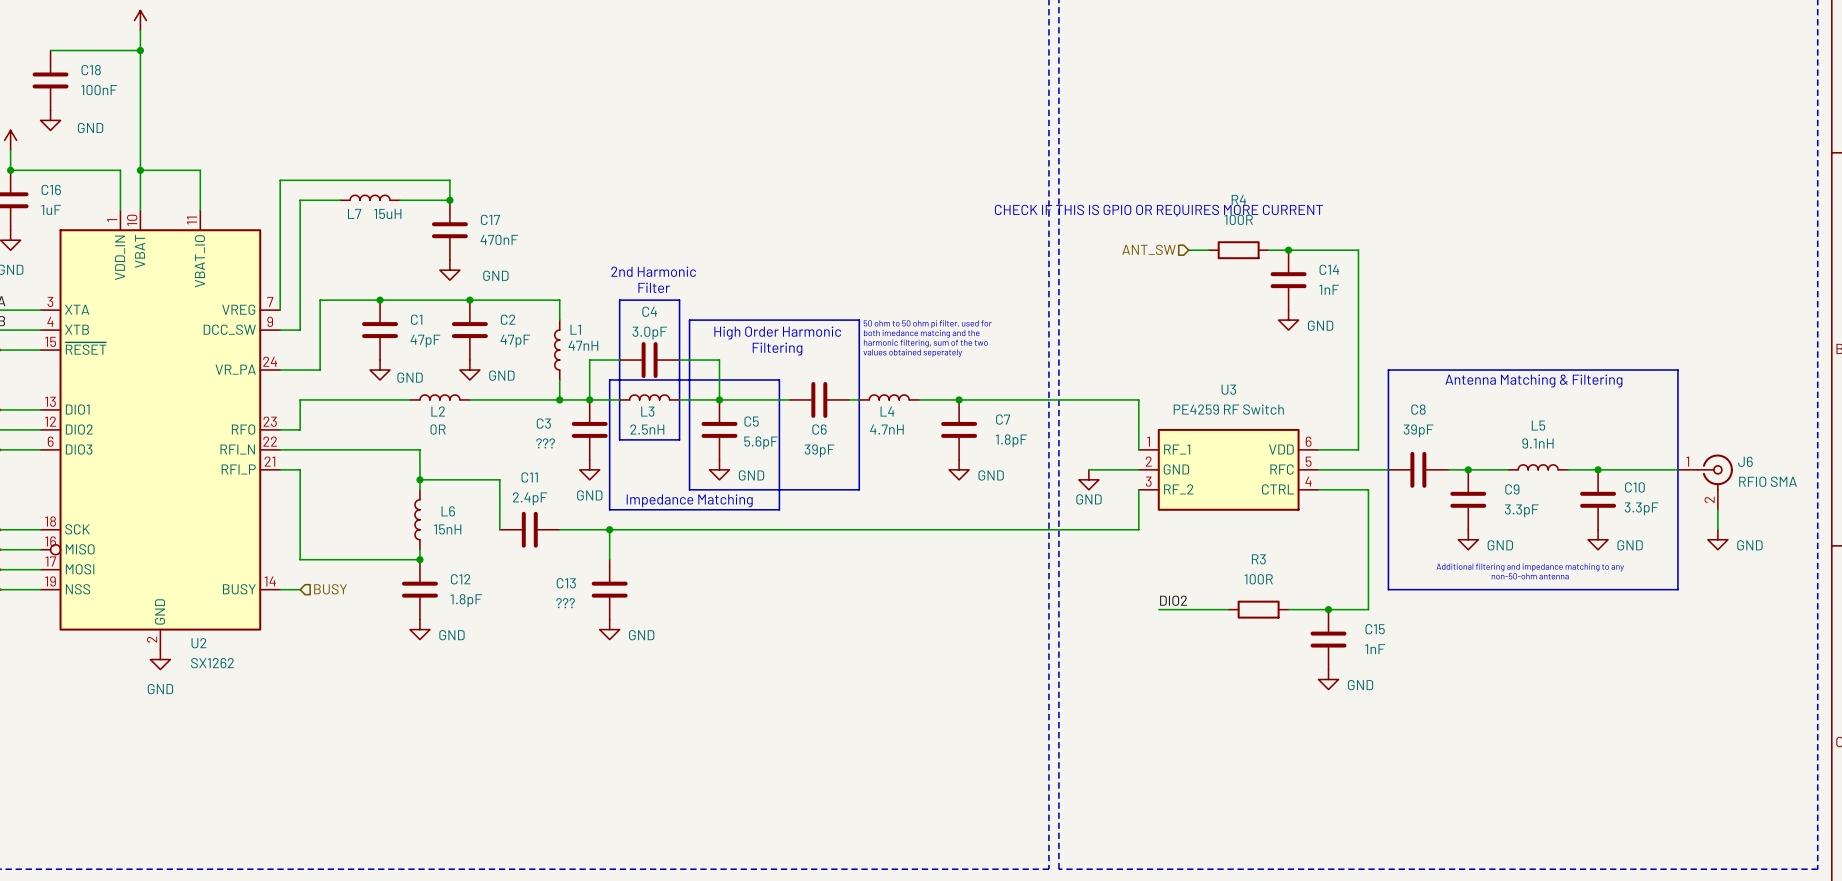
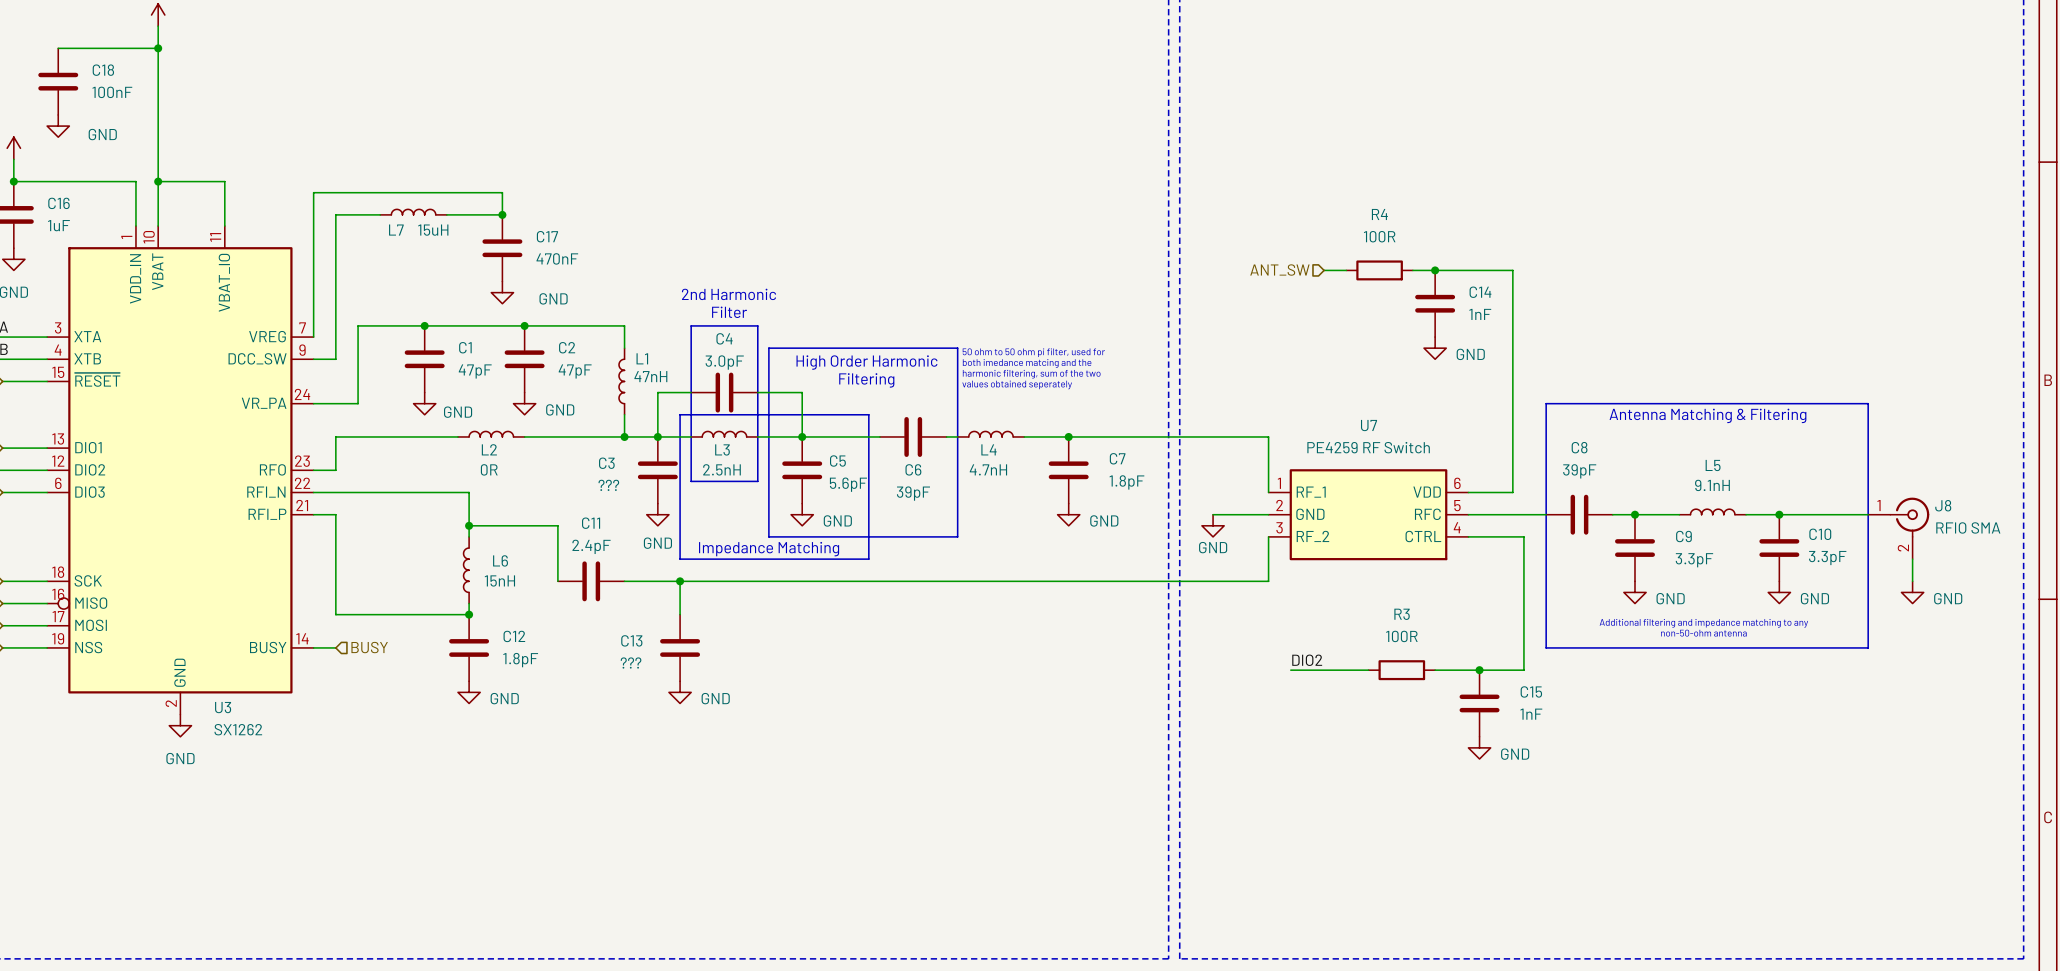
text: CHECK IF THIS IS GPIO OR REQUIRES MORE CURRENT (1158, 210) -> none
U3 name: U3 (1228, 389) -> U7 (1369, 425)
J6 name: J6 (1745, 461) -> J8 (1943, 505)
U2 name: U2 (198, 643) -> U3 (223, 707)

